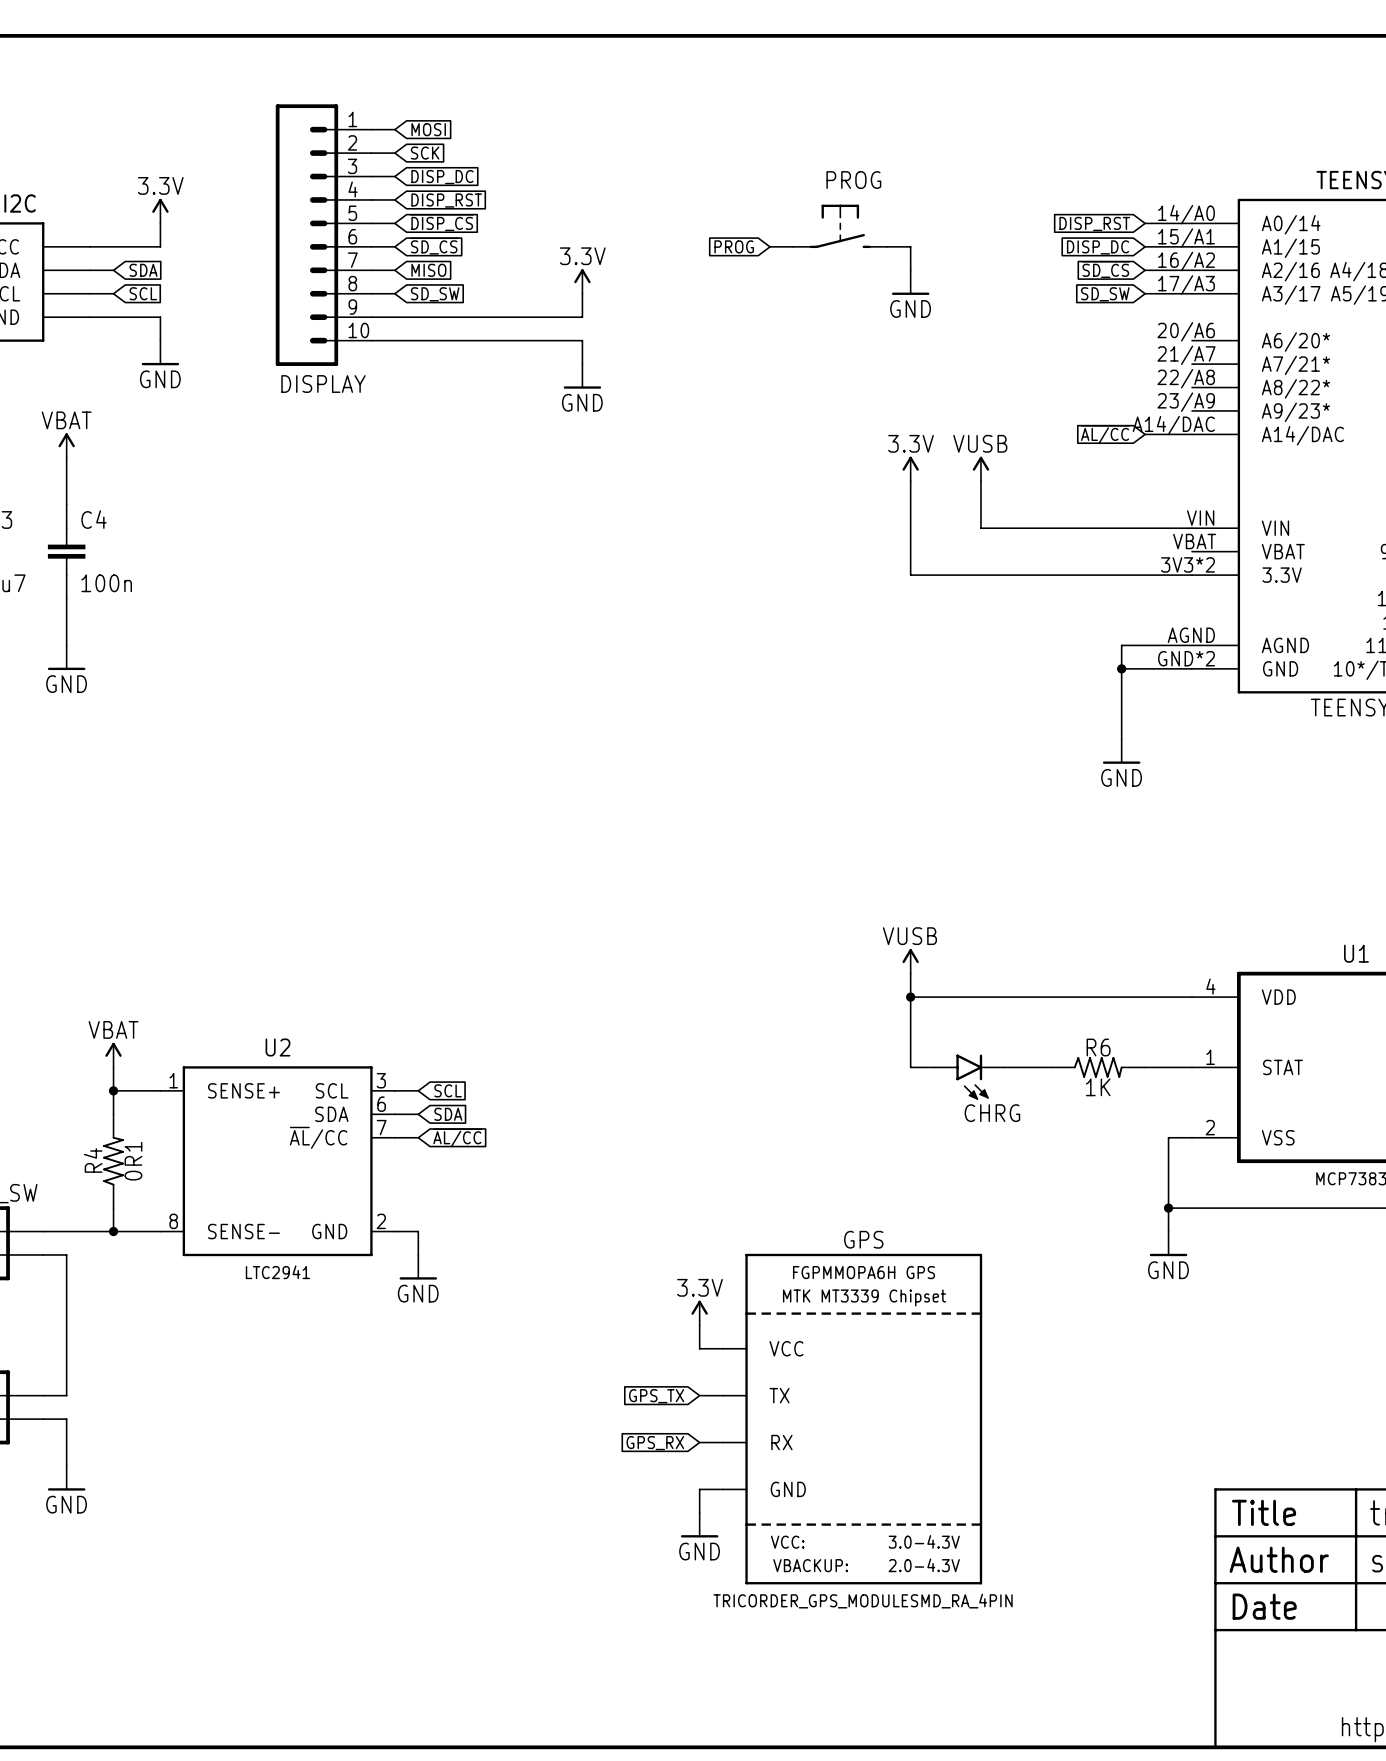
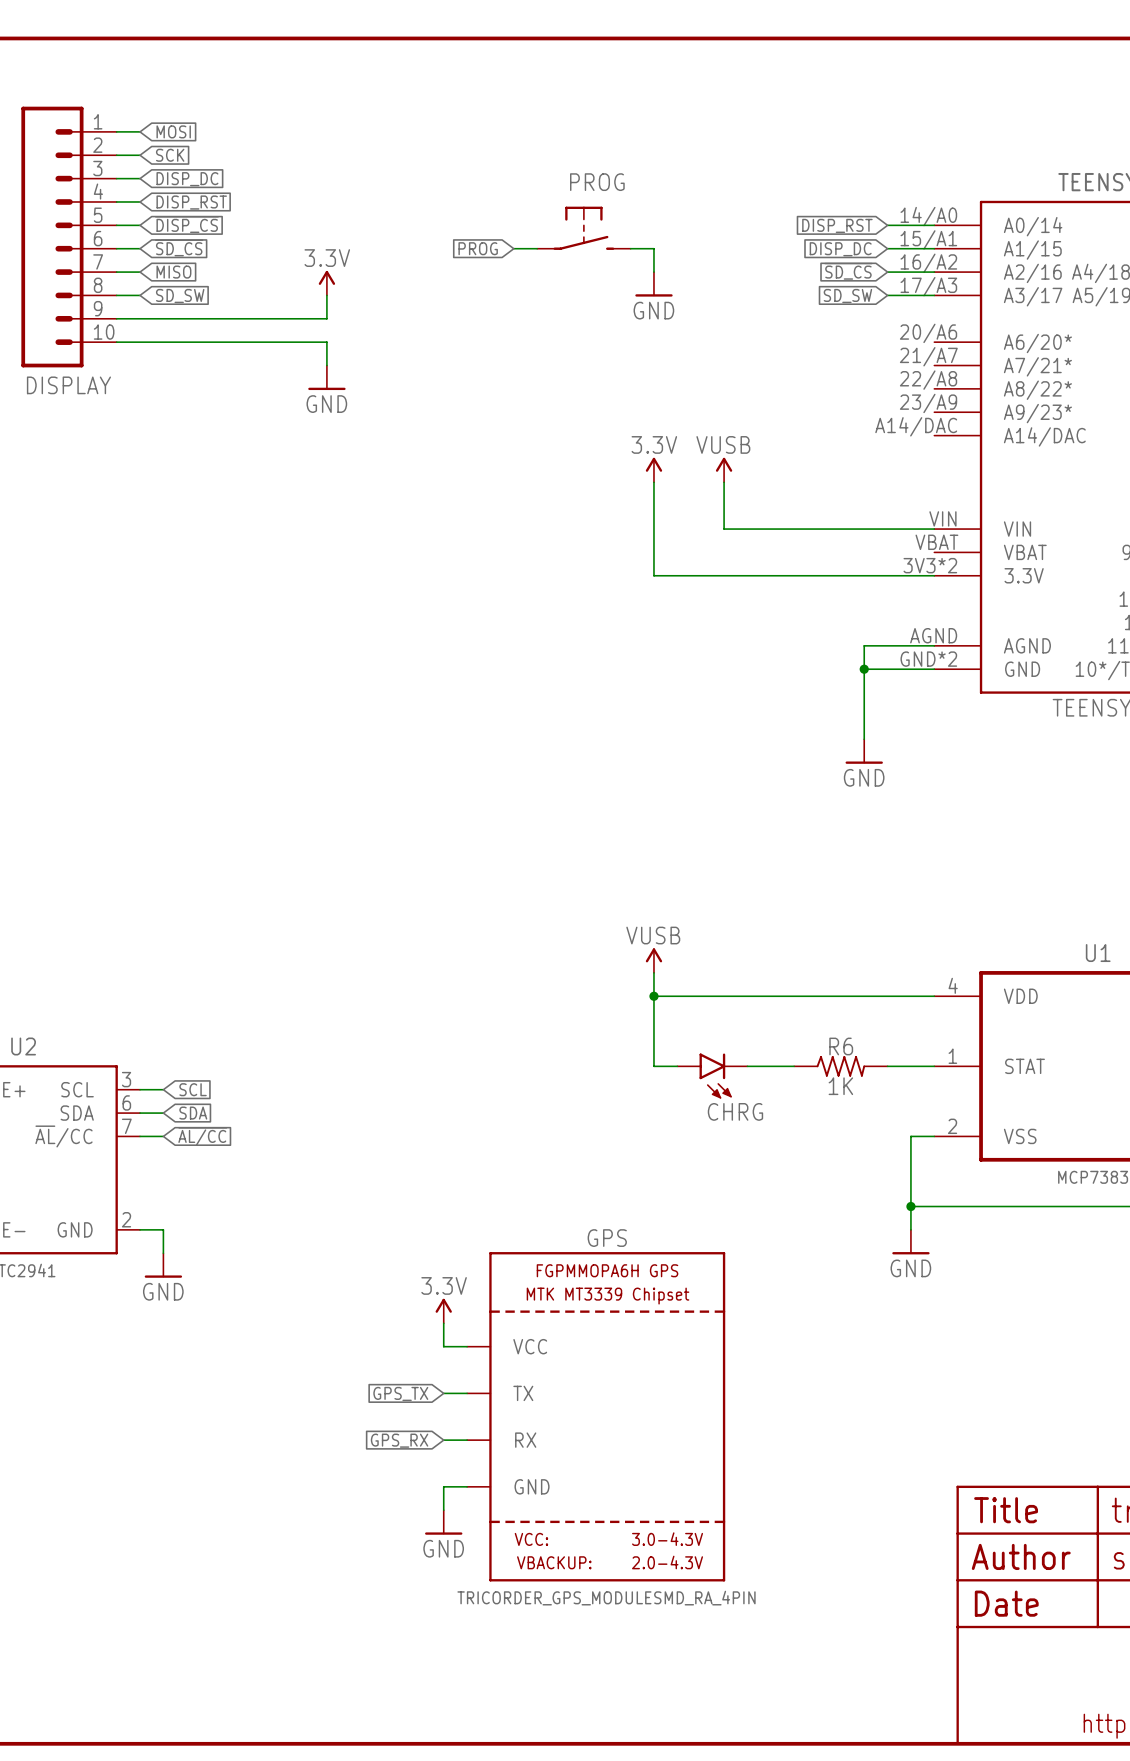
global label: ~{AL/CC} (1105, 434) -> none
wire: (1145, 434) (1191, 434) -> none

